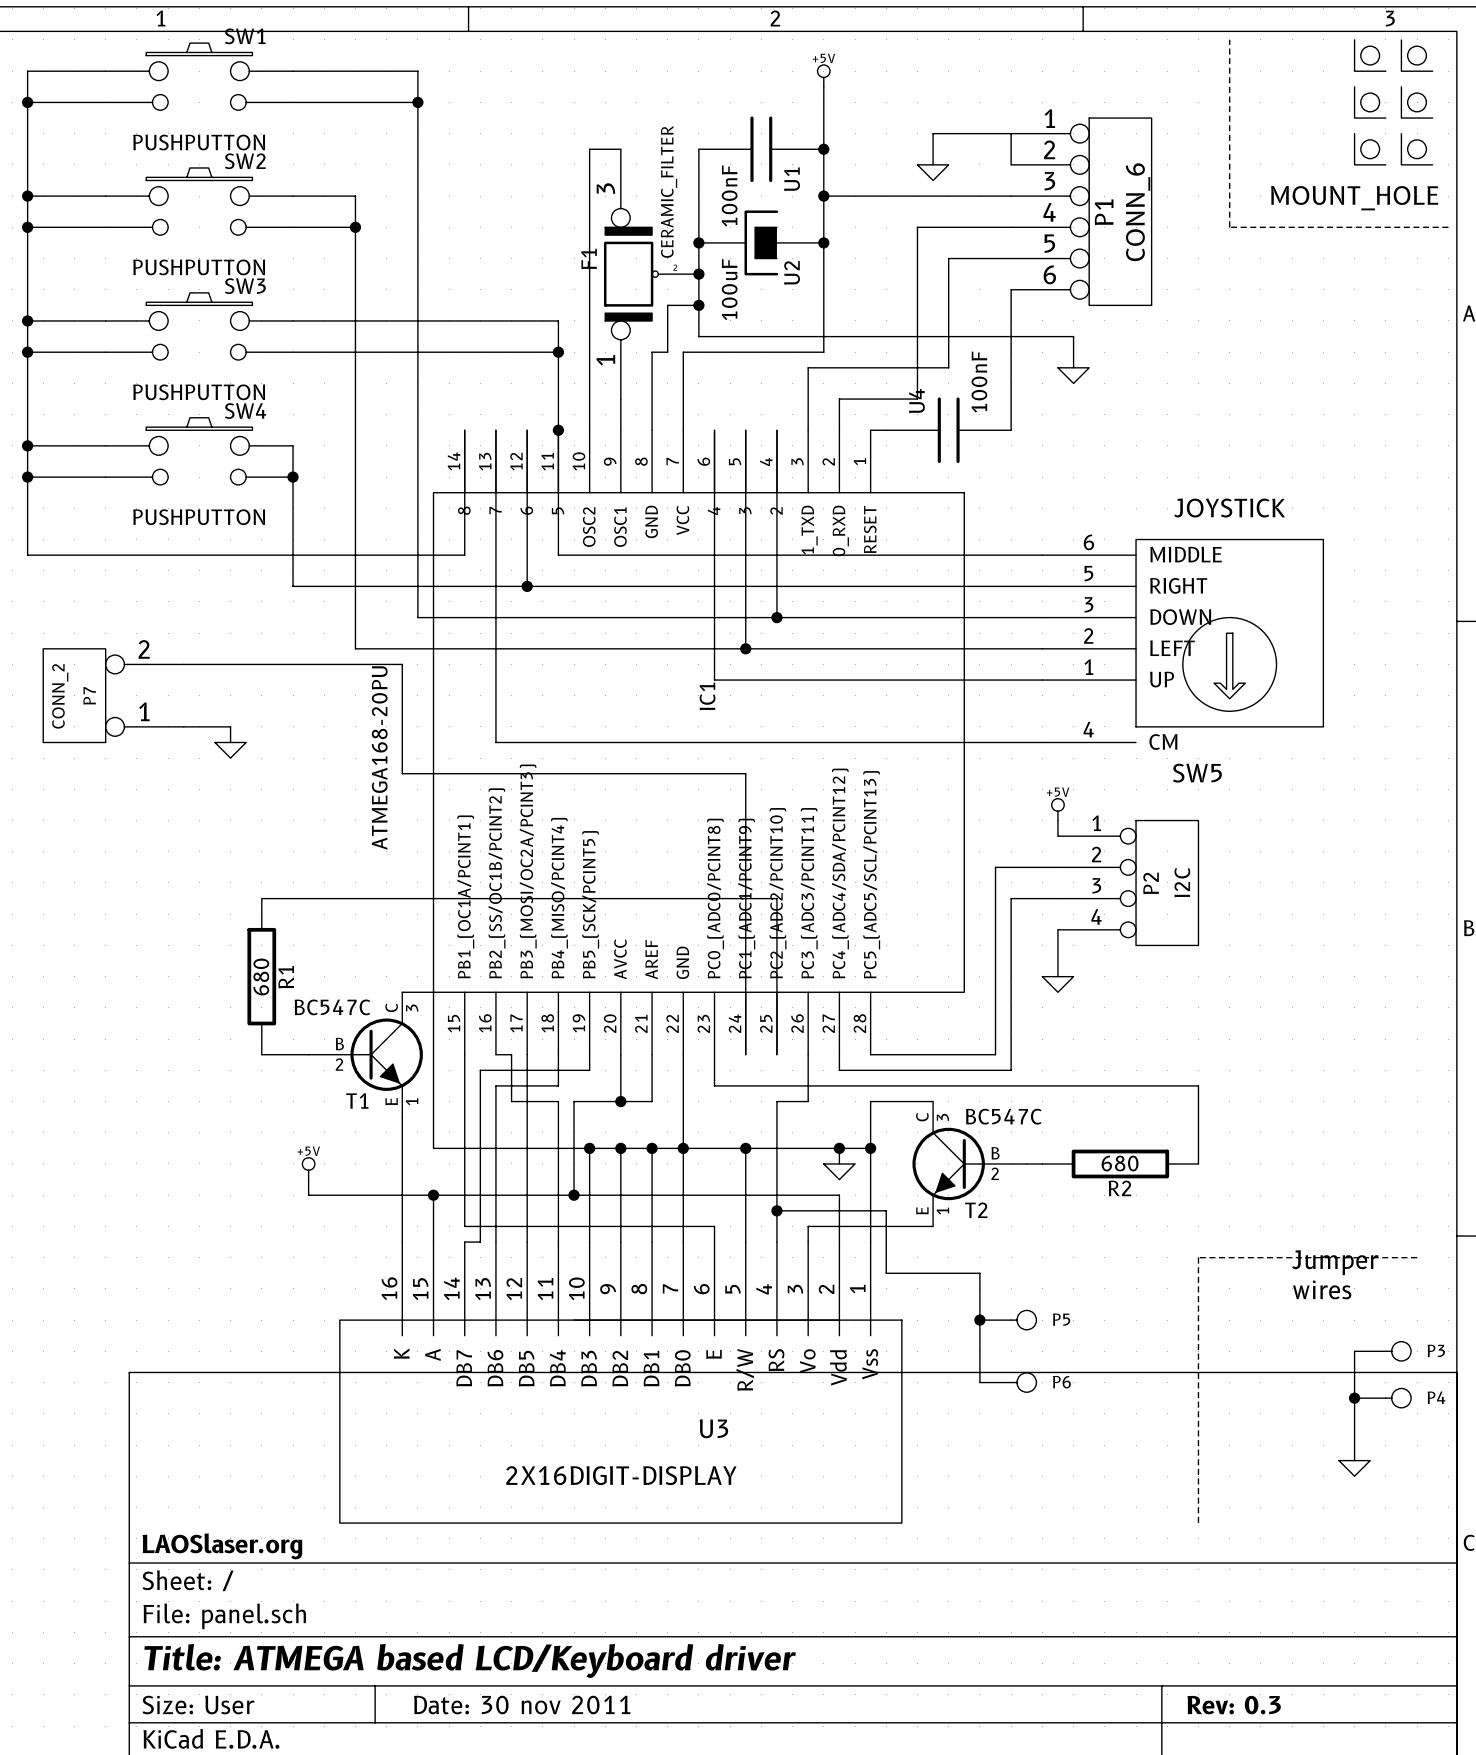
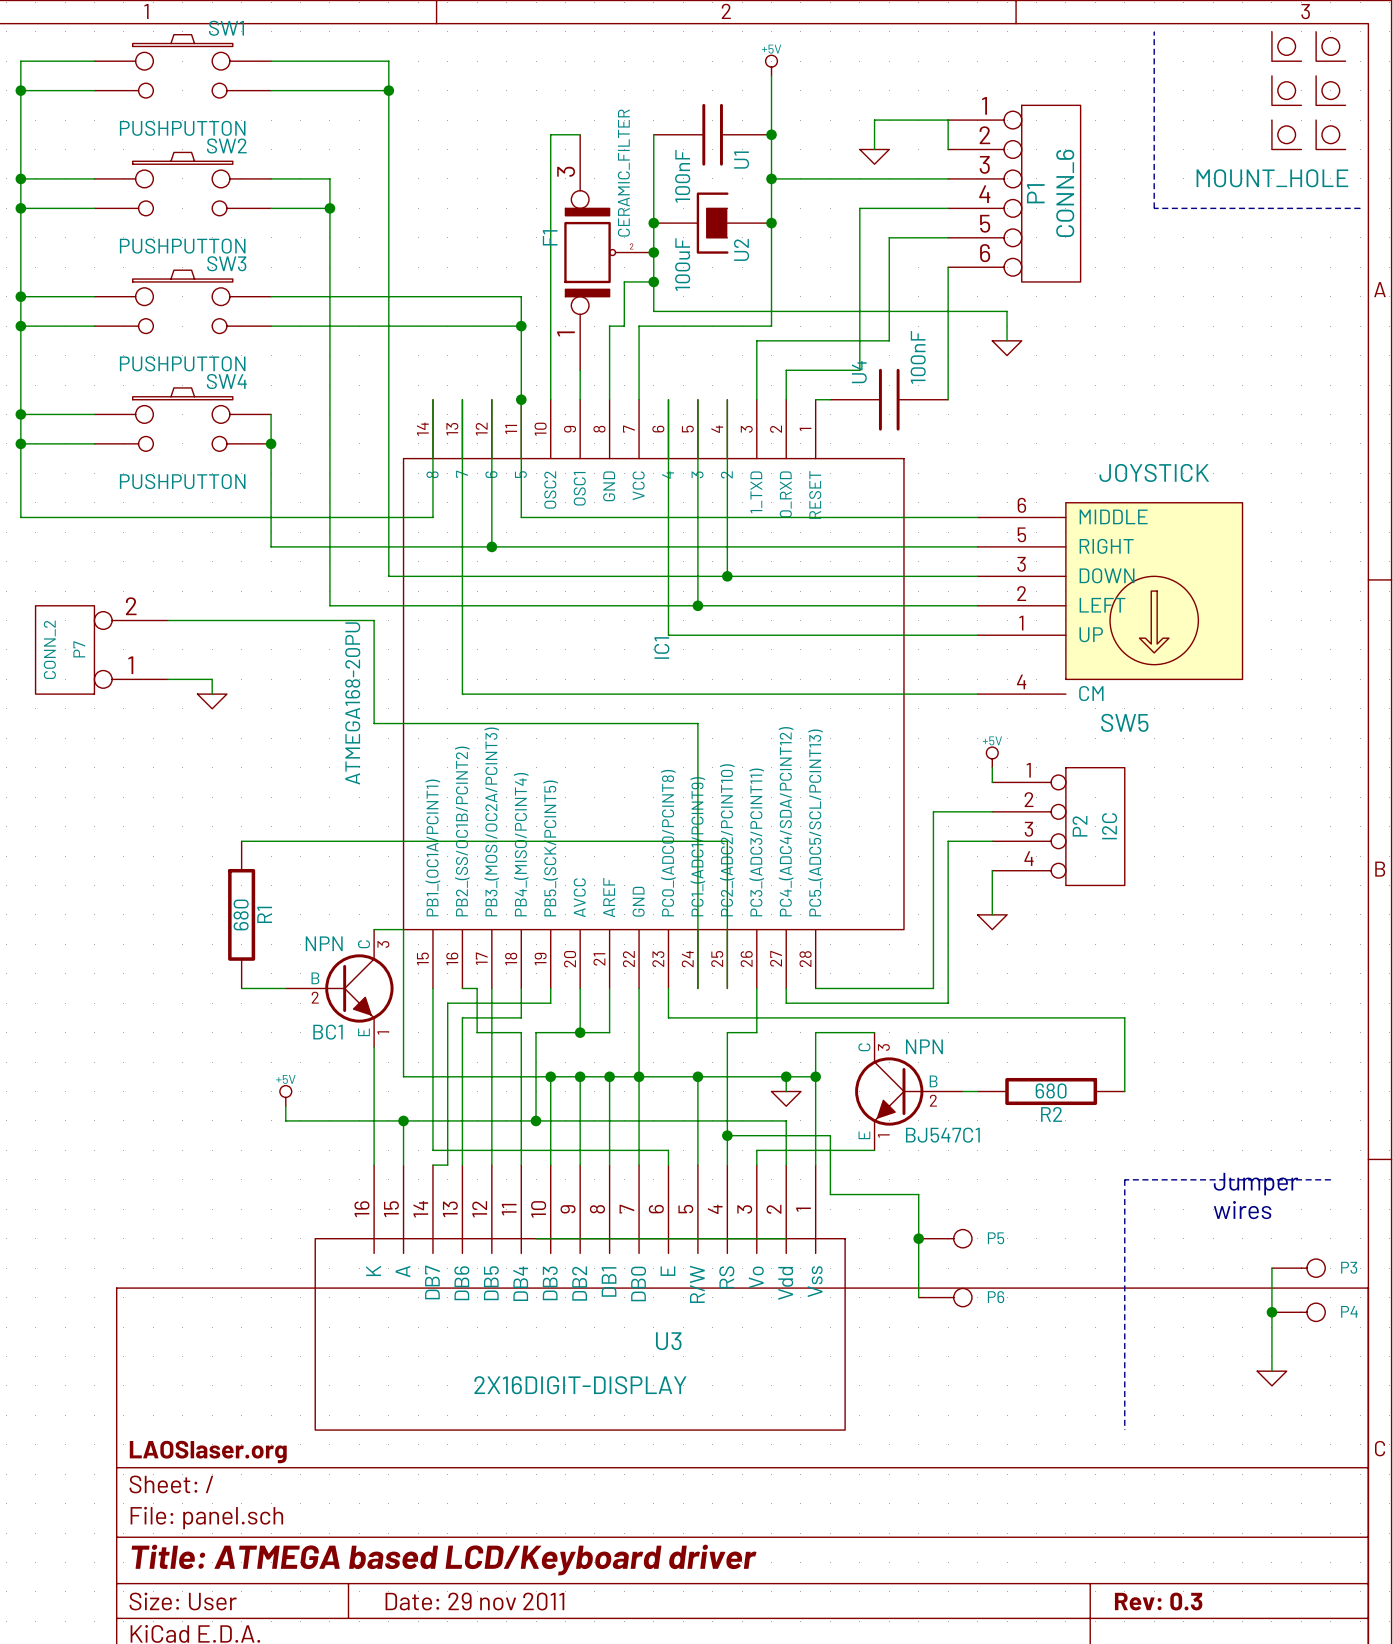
T1 value: BC547C (332, 1007) -> NPN (324, 943)
T1 name: T1 (357, 1100) -> BC1 (328, 1032)
T2 value: BC547C (1003, 1116) -> NPN (924, 1046)
T2 name: T2 (976, 1210) -> BJ547C1 (942, 1135)
title block: Date: 30 nov 2011 (522, 1705) -> Date: 29 nov 2011 (474, 1601)

